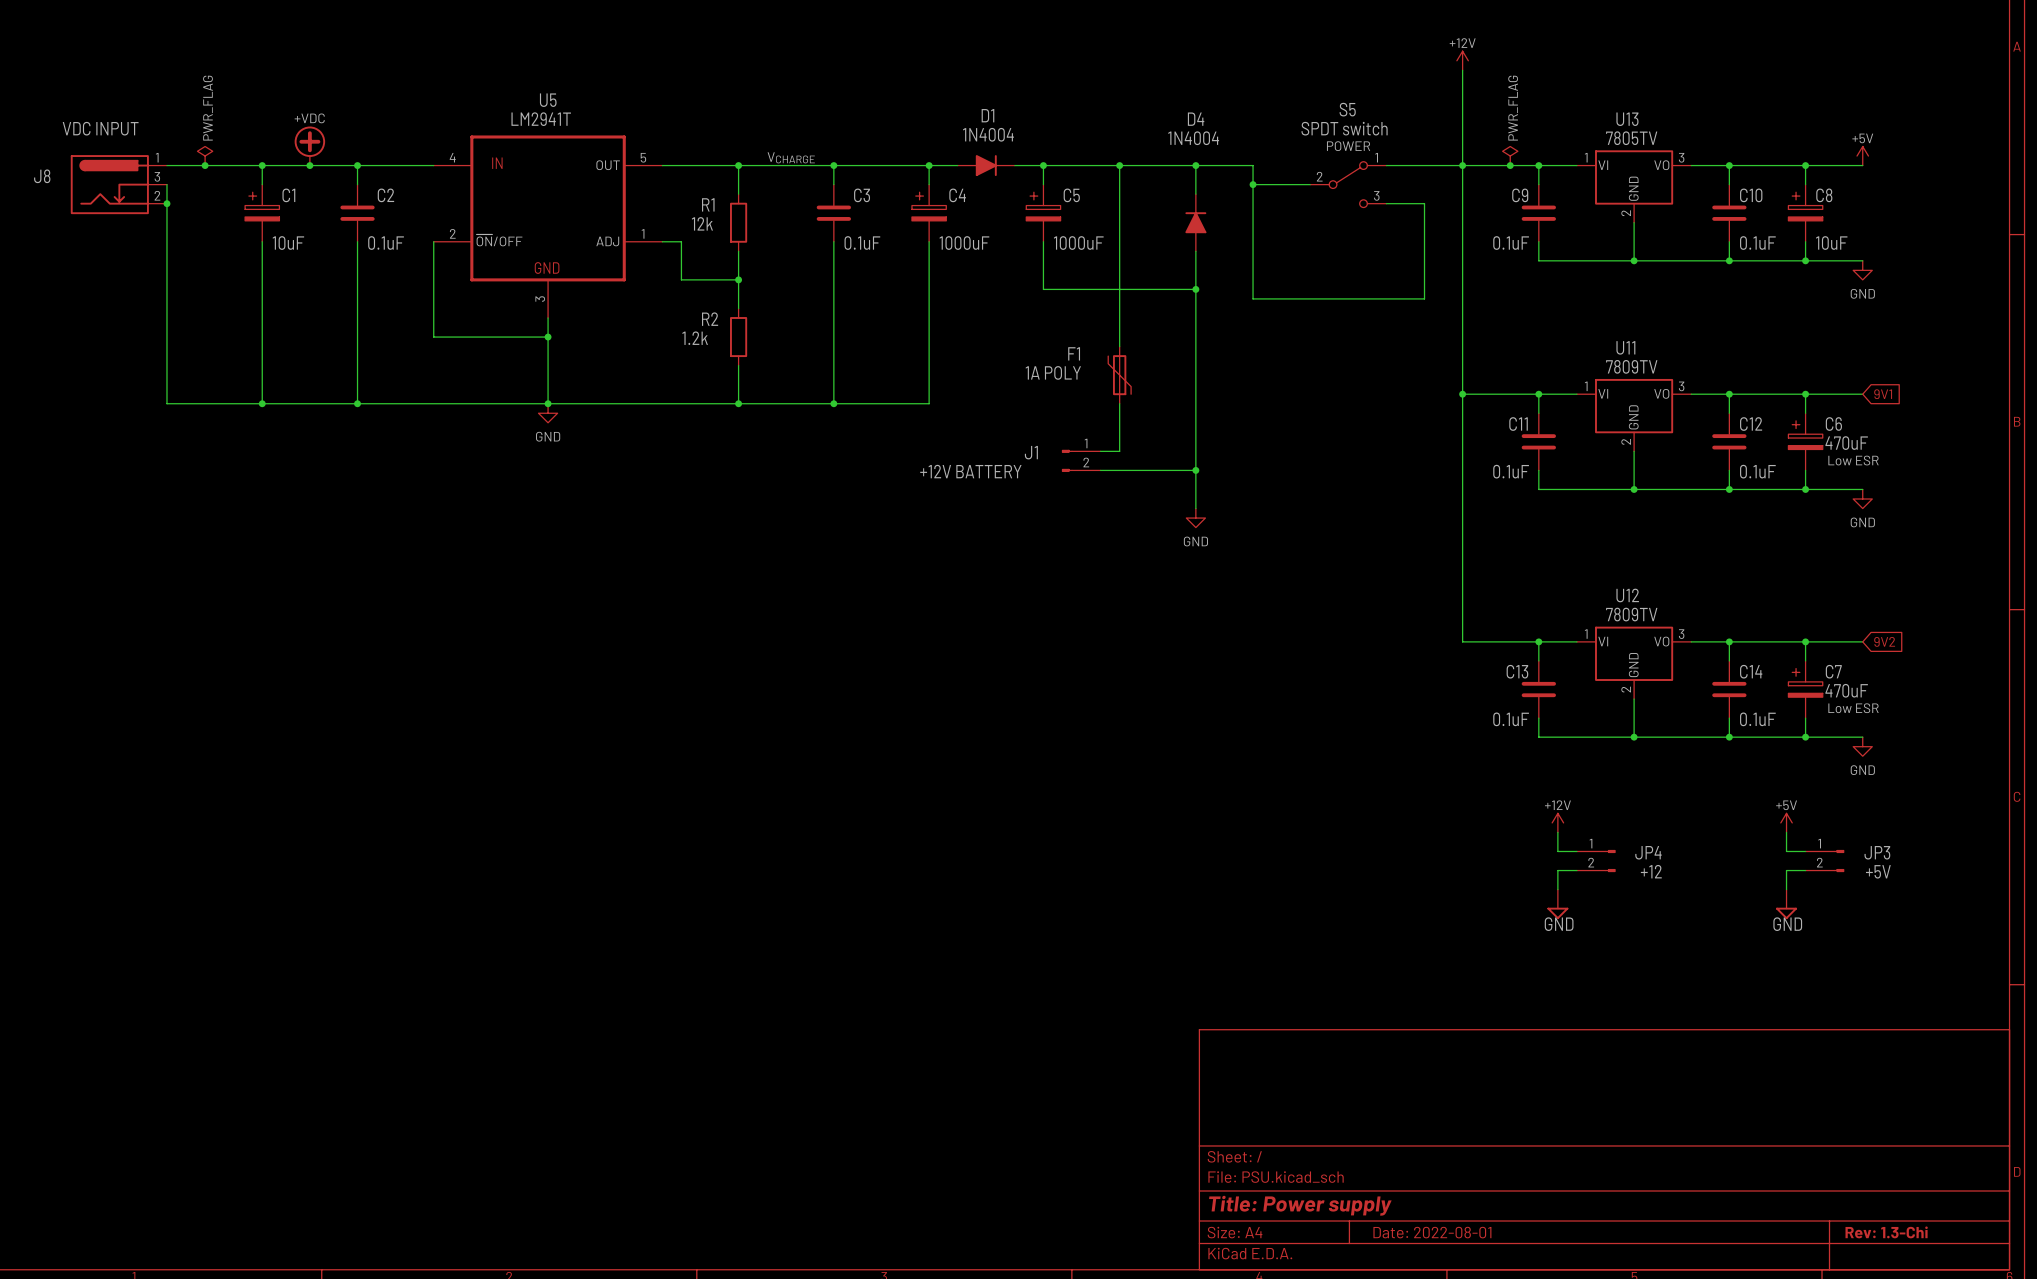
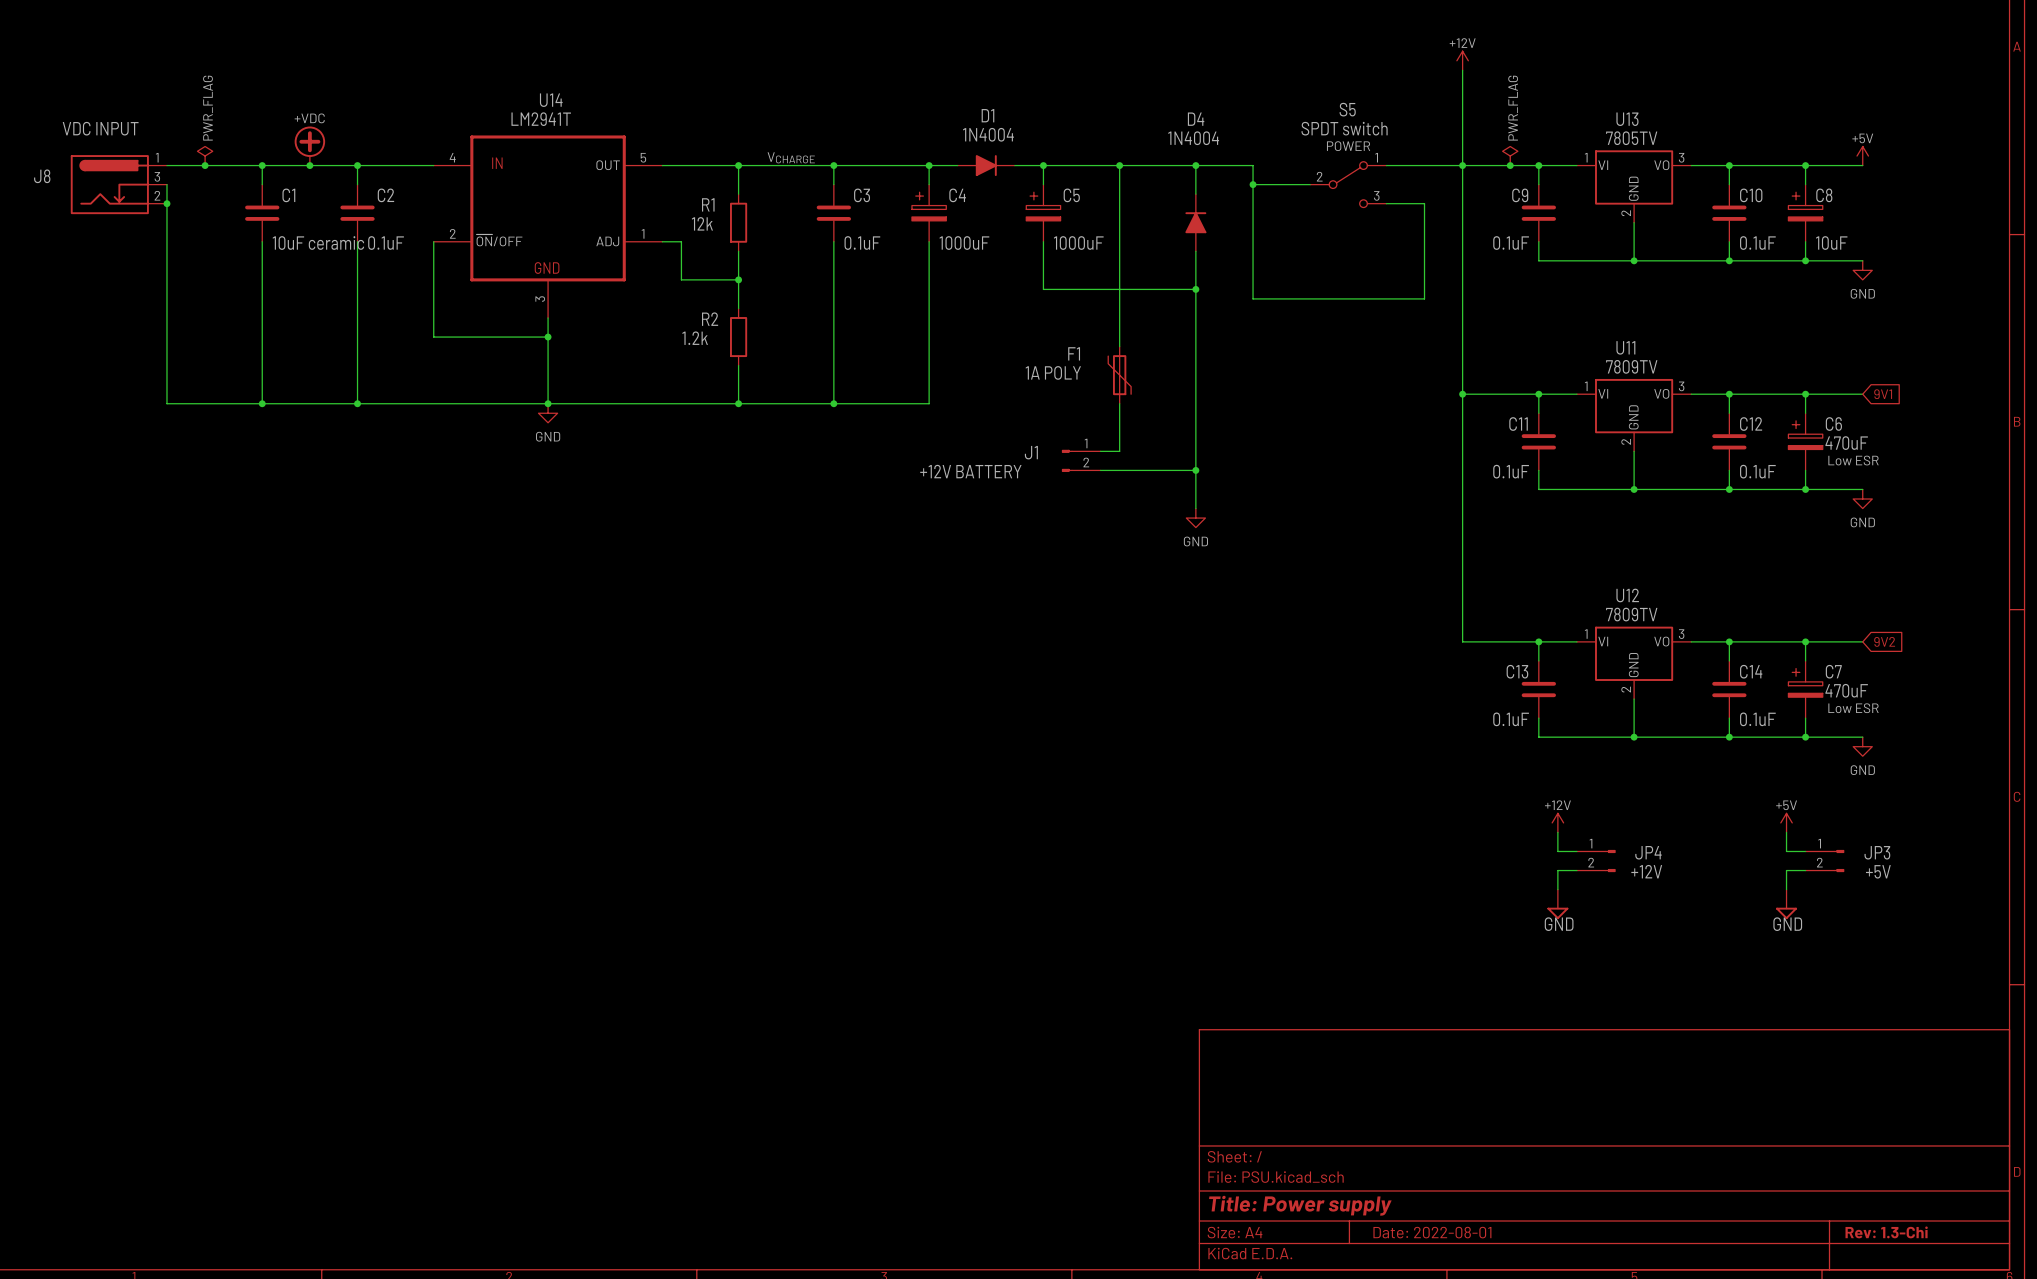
U5 name: U5 (548, 100) -> U14 (551, 100)
C1 symbol: [245, 184, 280, 242] -> [245, 184, 280, 242]
C1 value: 10uF (288, 243) -> 10uF ceramic (318, 243)
JP4 value: +12 (1651, 871) -> +12V (1646, 871)

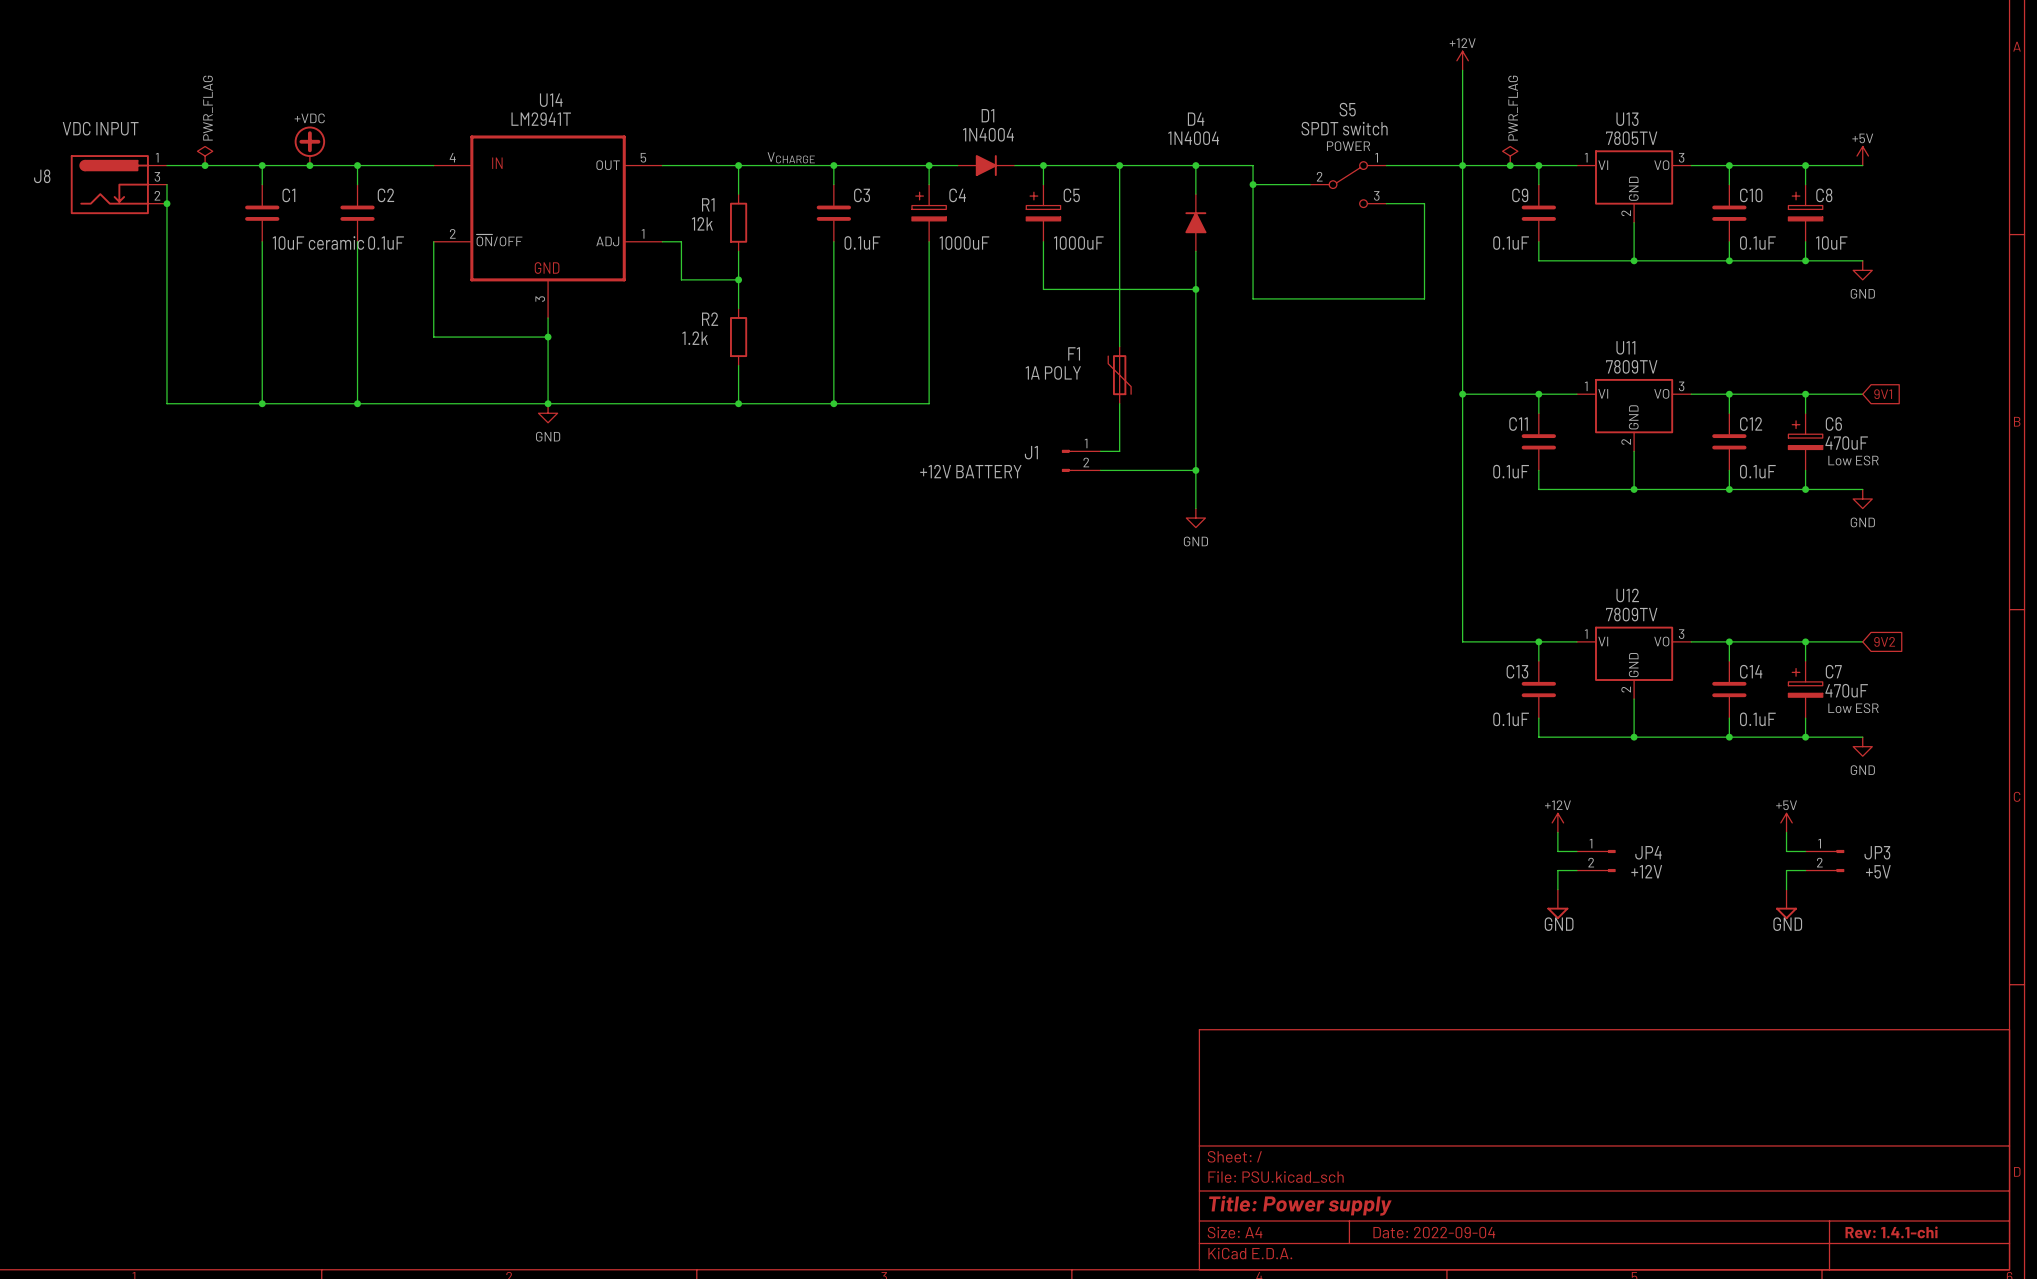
title block: Date: 2022-08-01 (1432, 1232) -> Date: 2022-09-04 (1434, 1232)
title block: Rev: 1.3-Chi (1886, 1232) -> Rev: 1.4.1-chi (1891, 1232)

